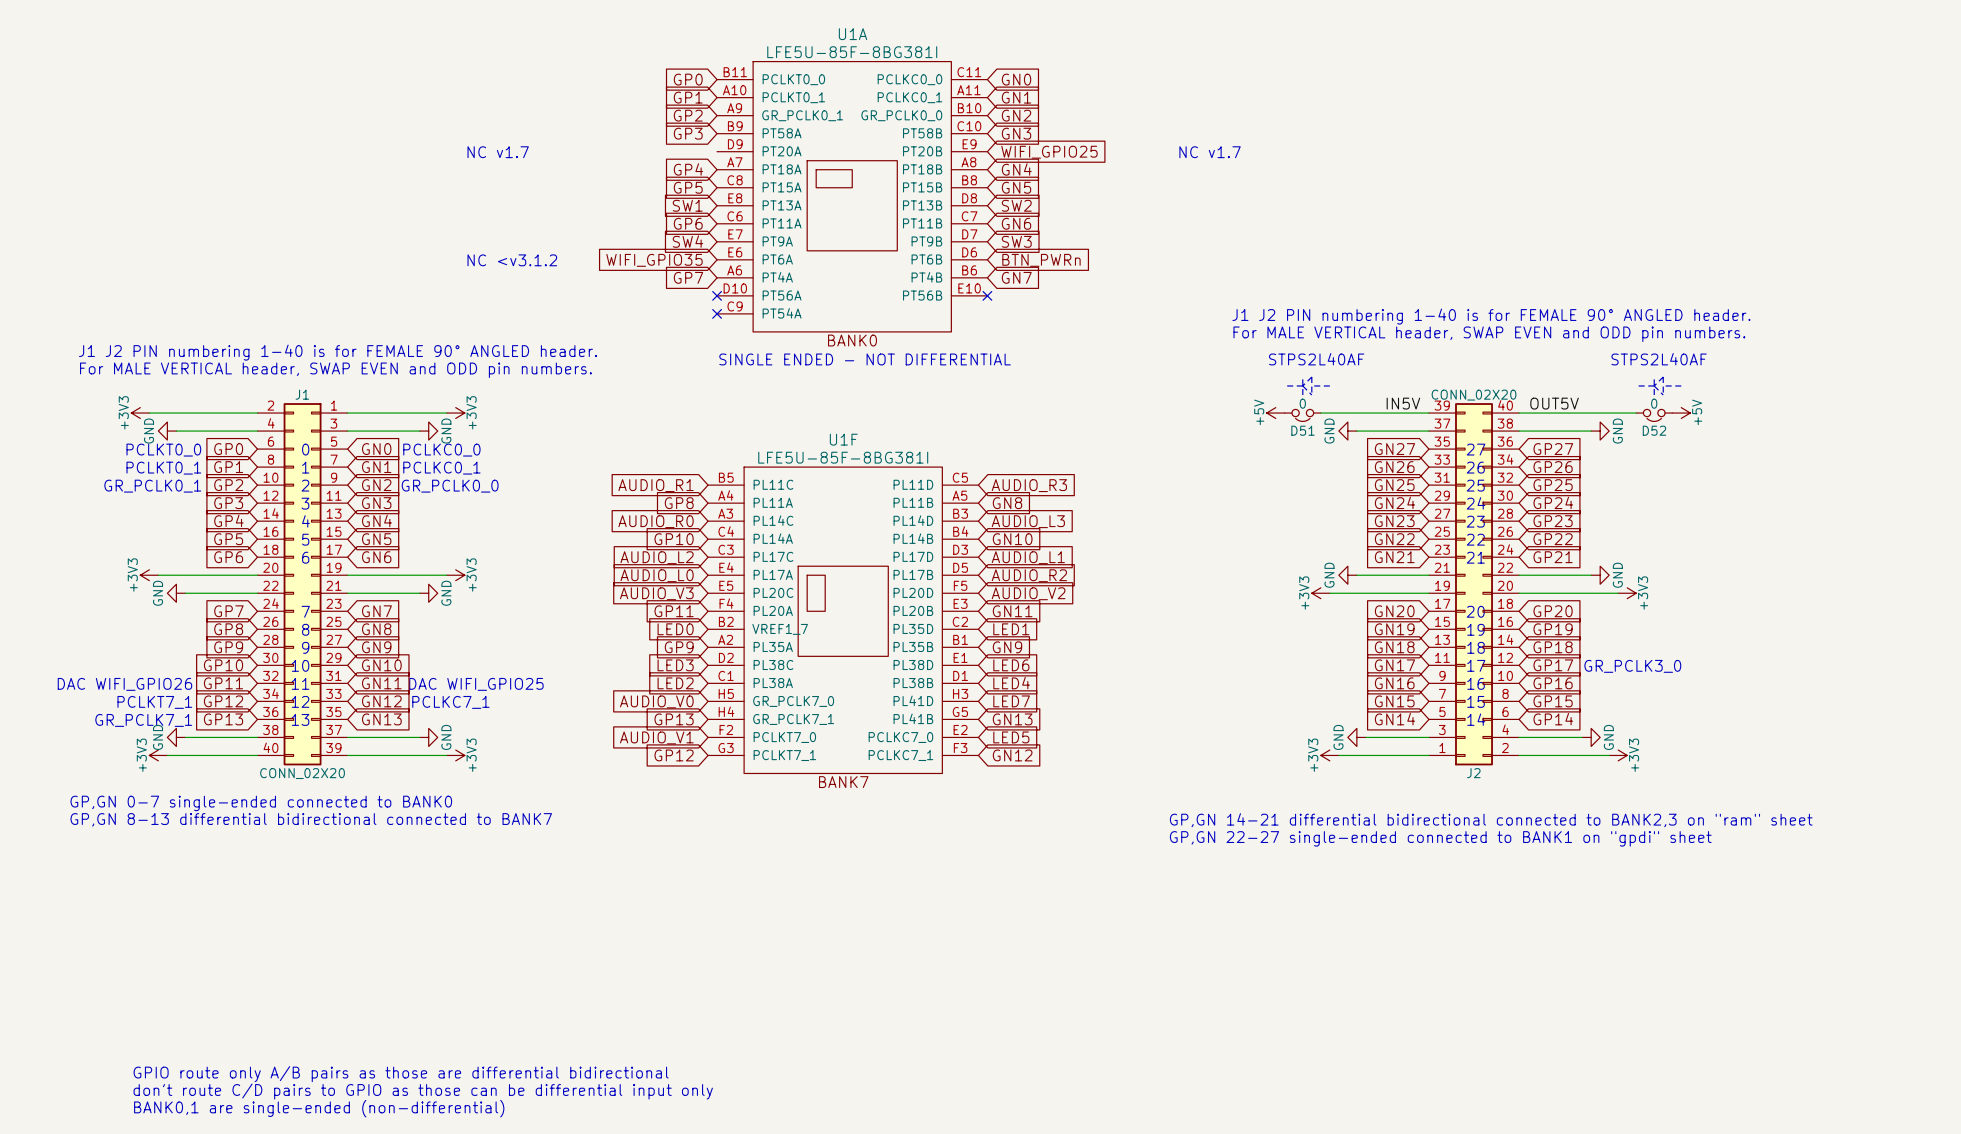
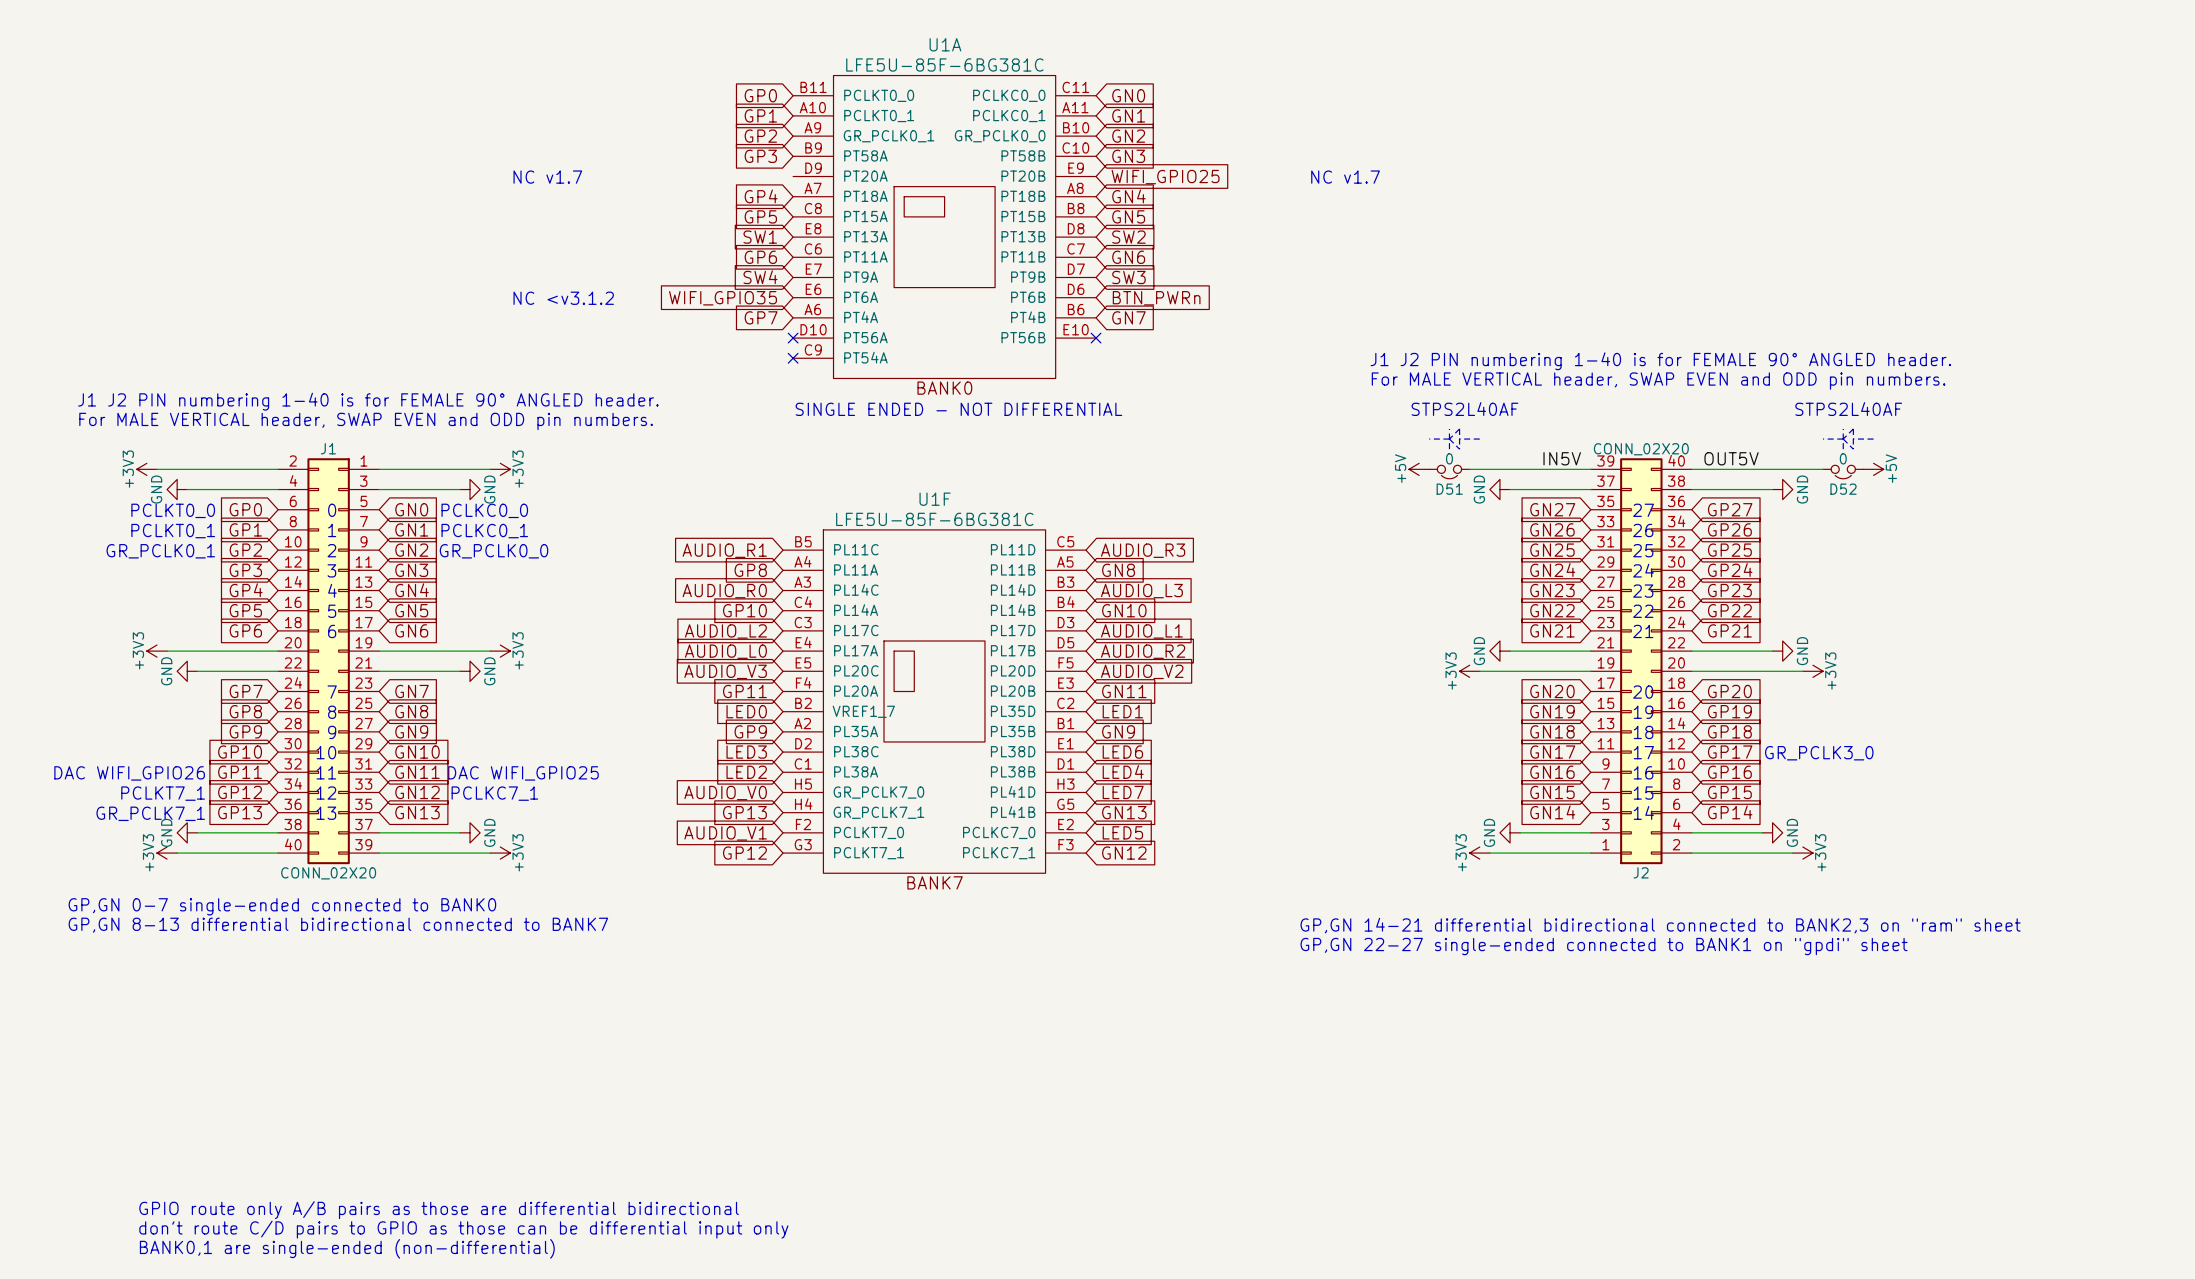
U1A value: LFE5U-85F-8BG381I (852, 52) -> LFE5U-85F-6BG381C (944, 64)
U1F value: LFE5U-85F-8BG381I (843, 457) -> LFE5U-85F-6BG381C (934, 519)

